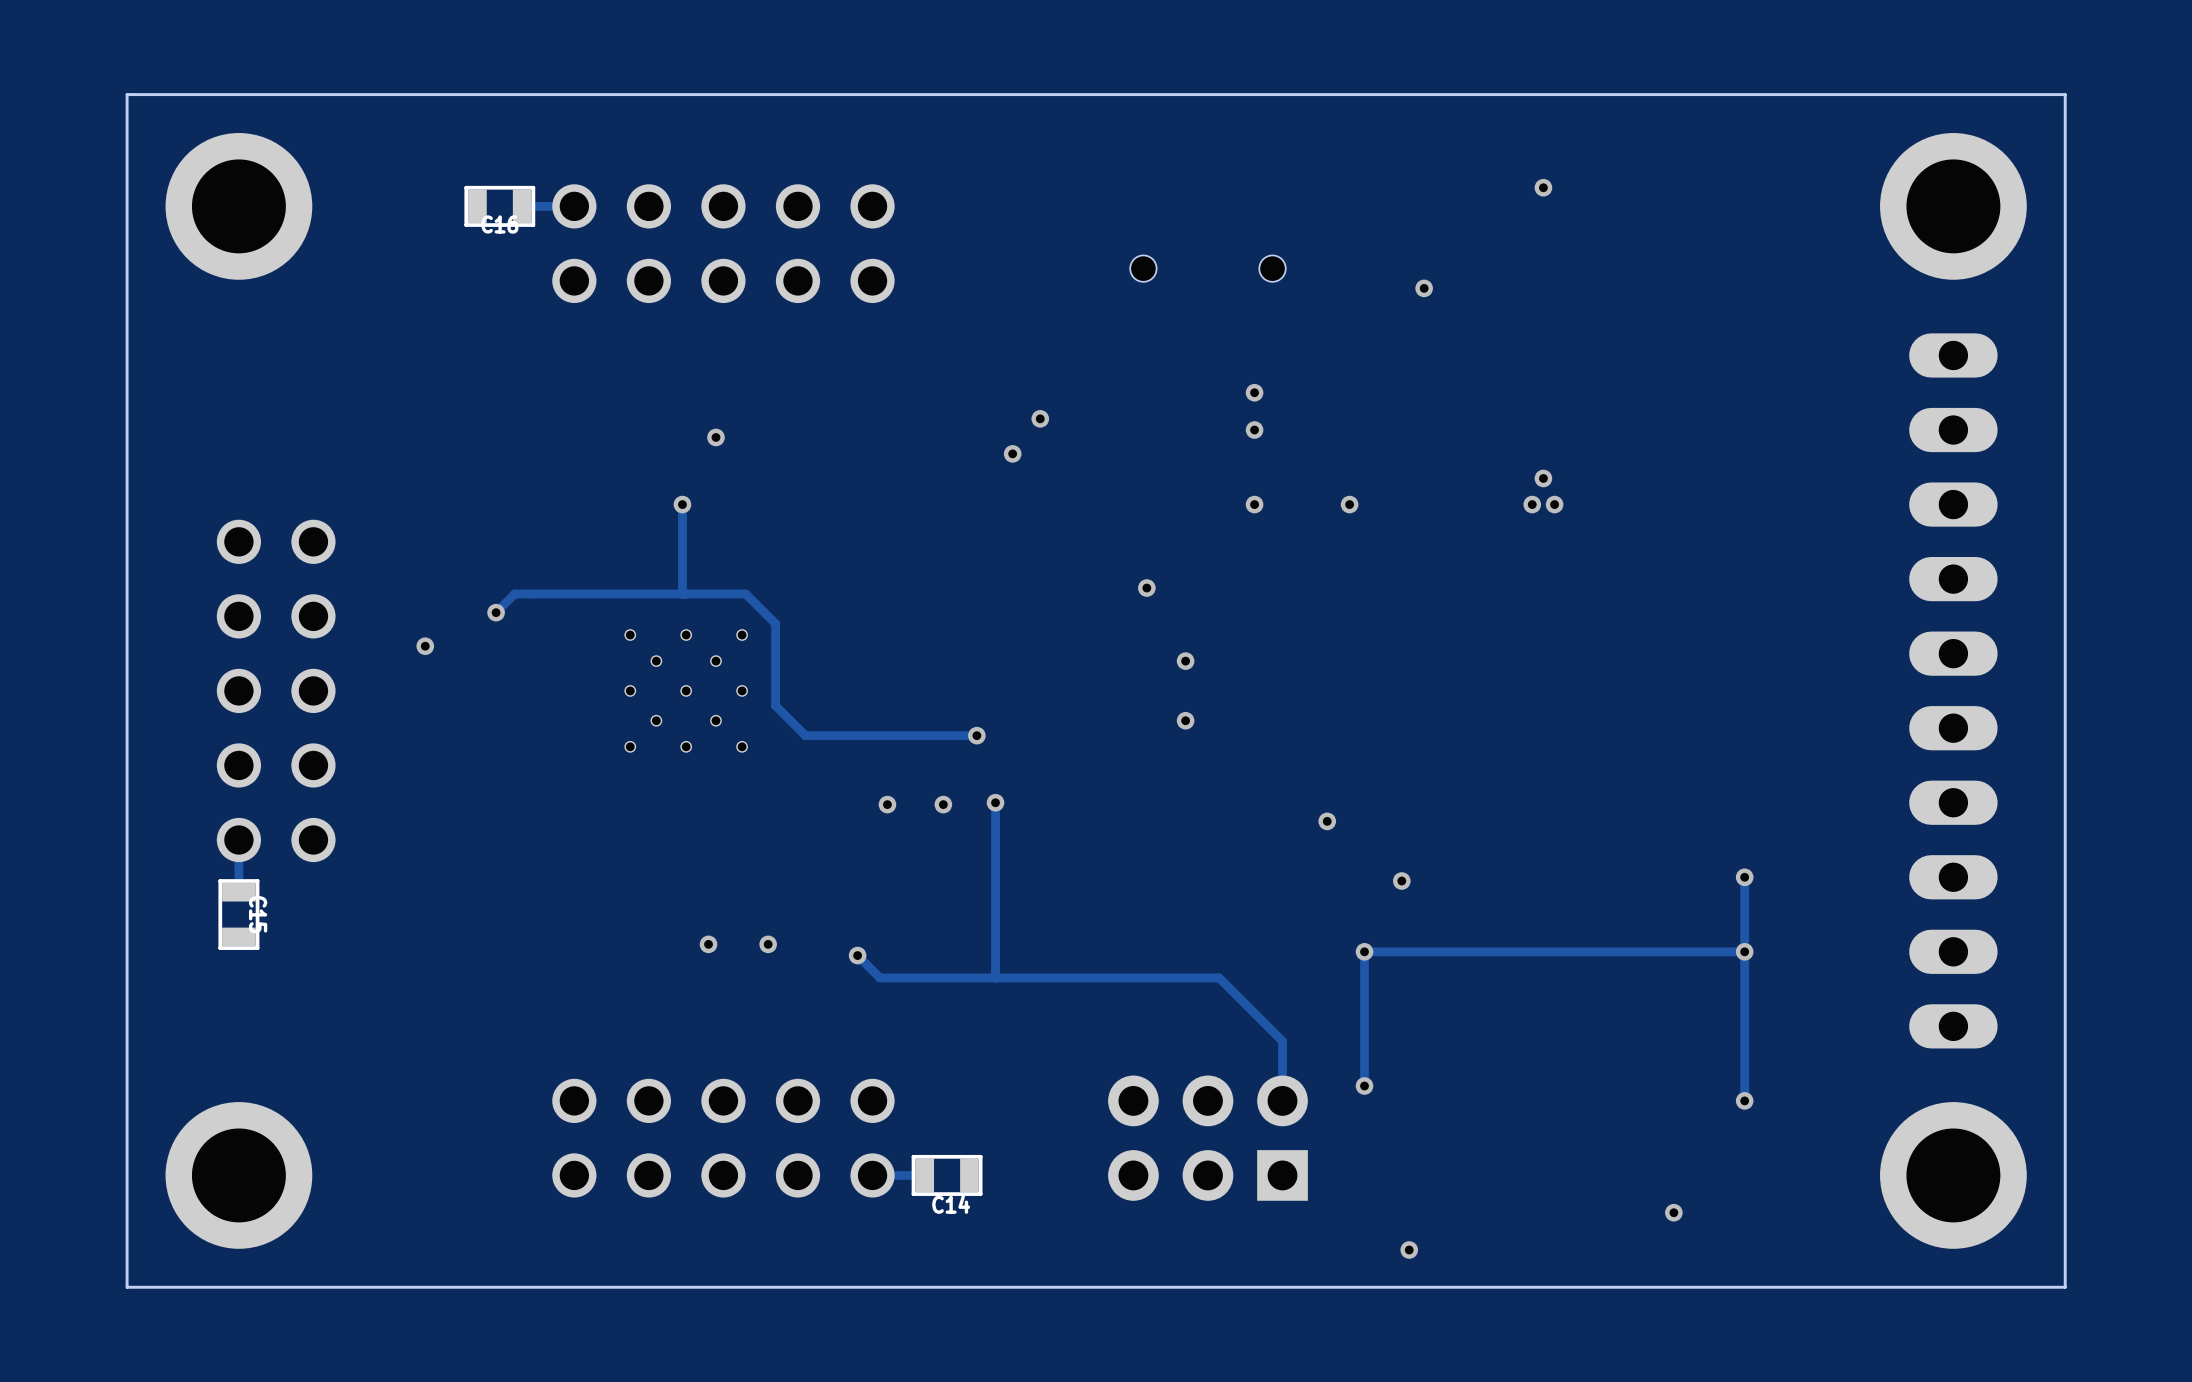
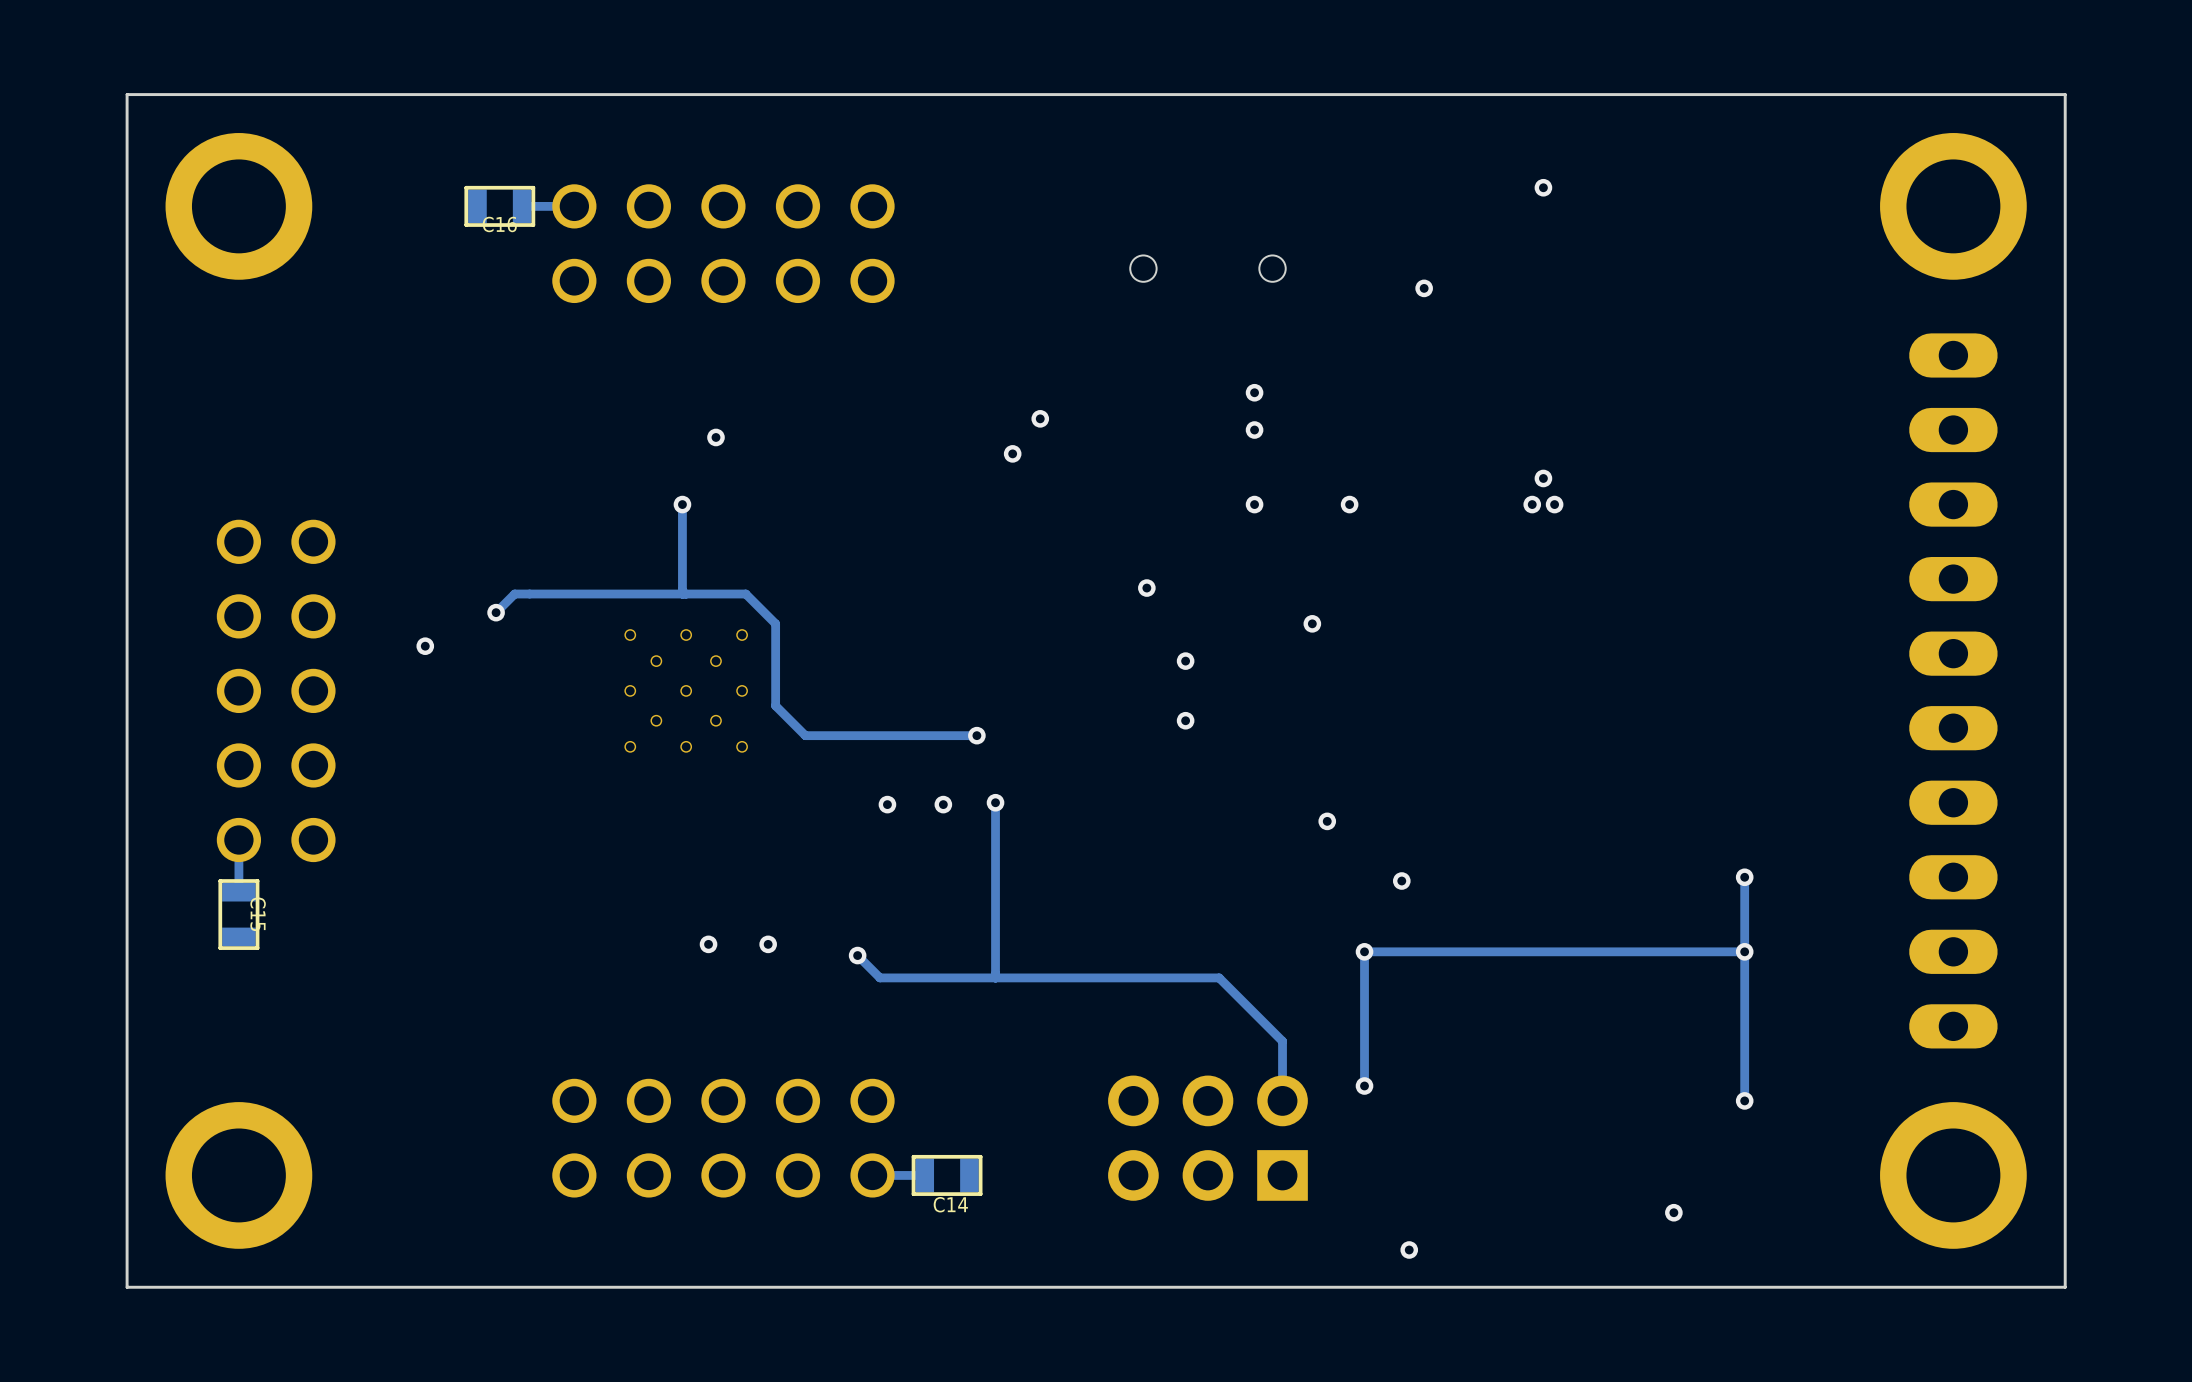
via: none -> (1312, 623)

